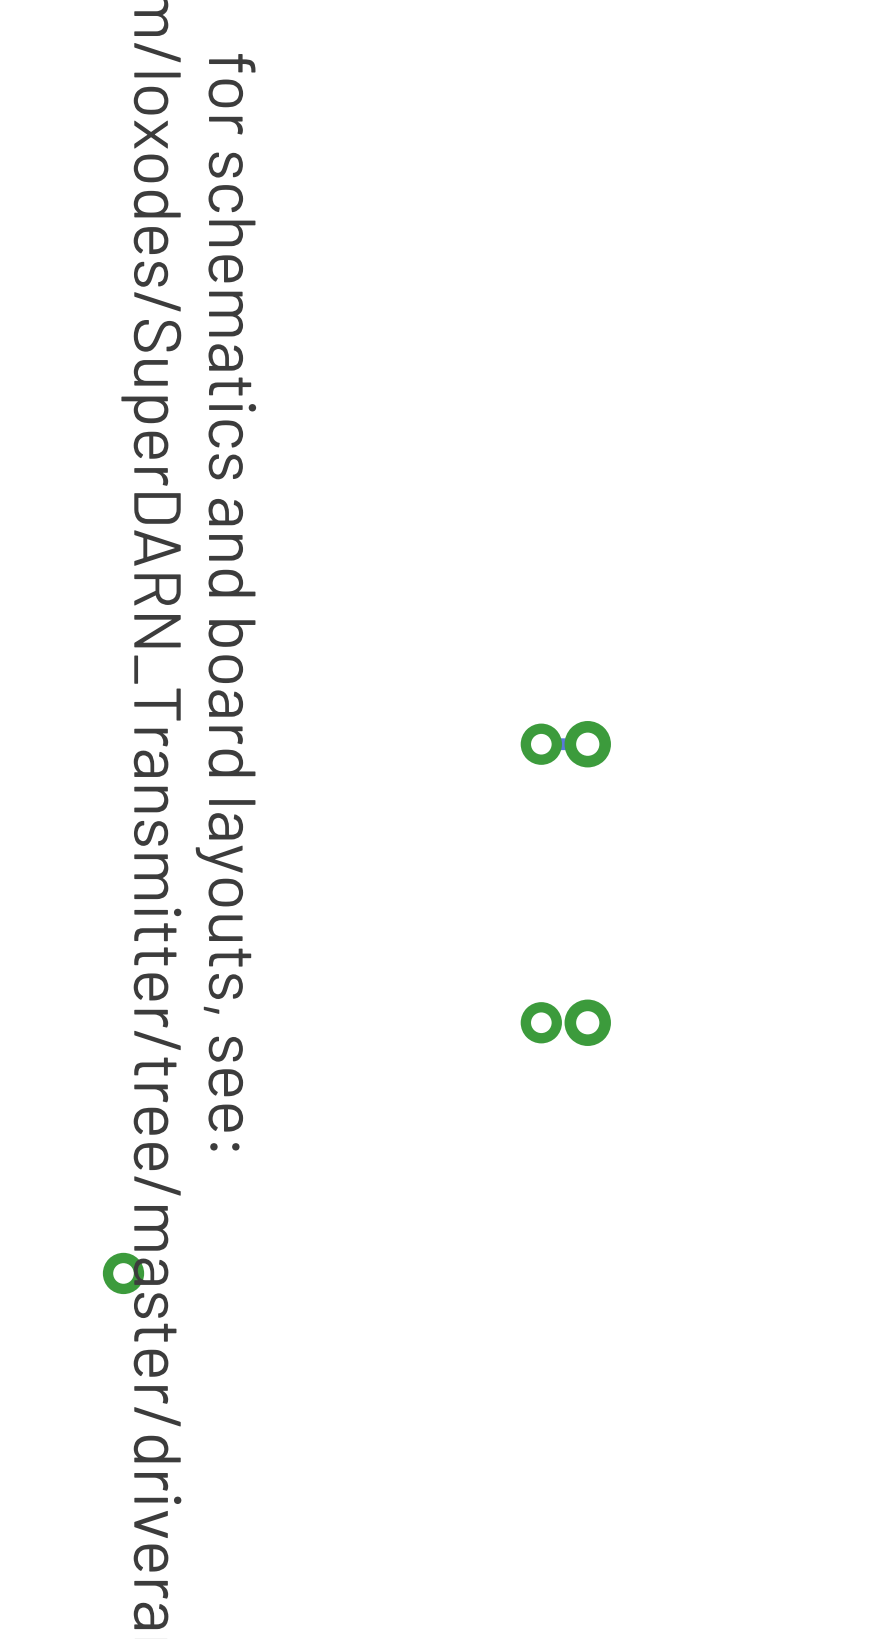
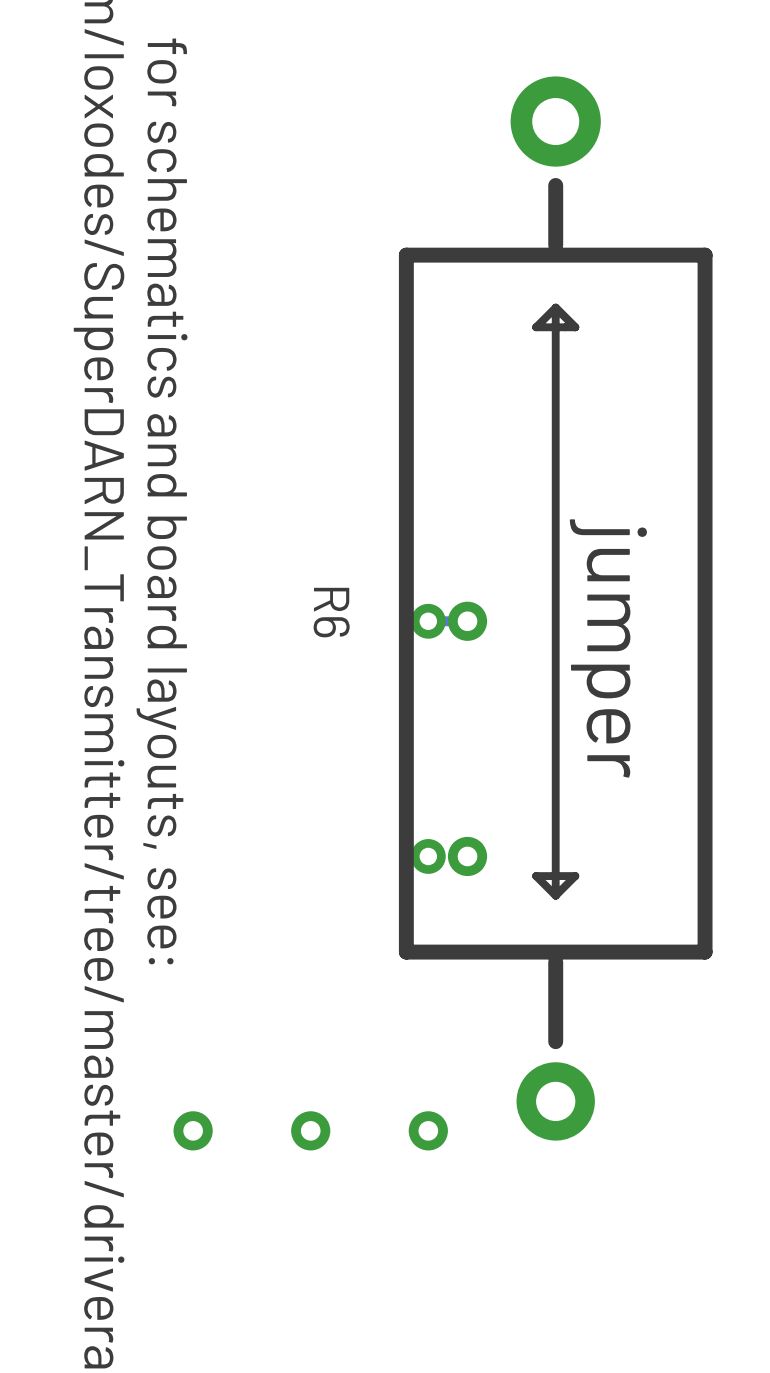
line: none -> (555, 307) (555, 895)
line: none -> (555, 307) (575, 327) (536, 327) (555, 307)
R6: none -> (555, 608)
text: none -> jumper (608, 648)
line: none -> (555, 895) (575, 876) (536, 876) (555, 895)
via: (123, 1273) -> none
via: none -> (193, 1130)
via: none -> (310, 1130)
via: none -> (428, 1130)

